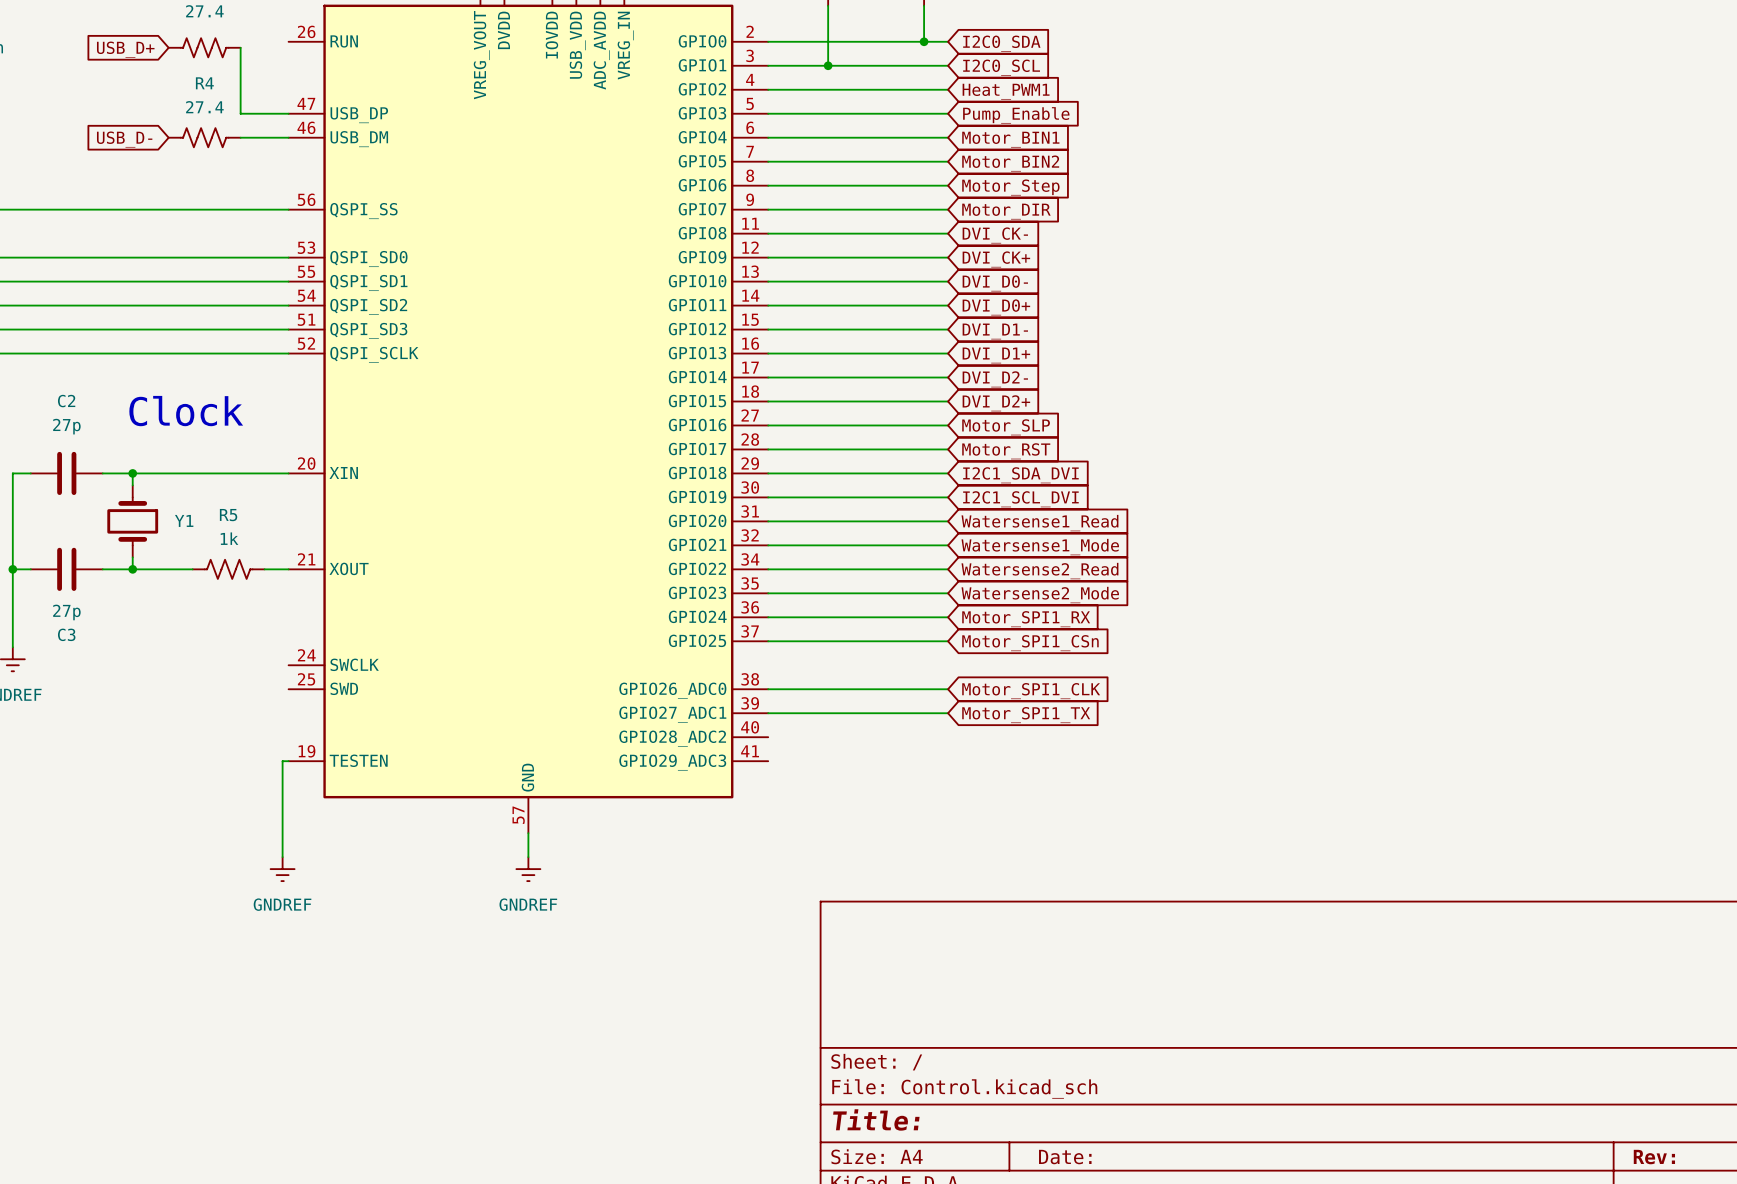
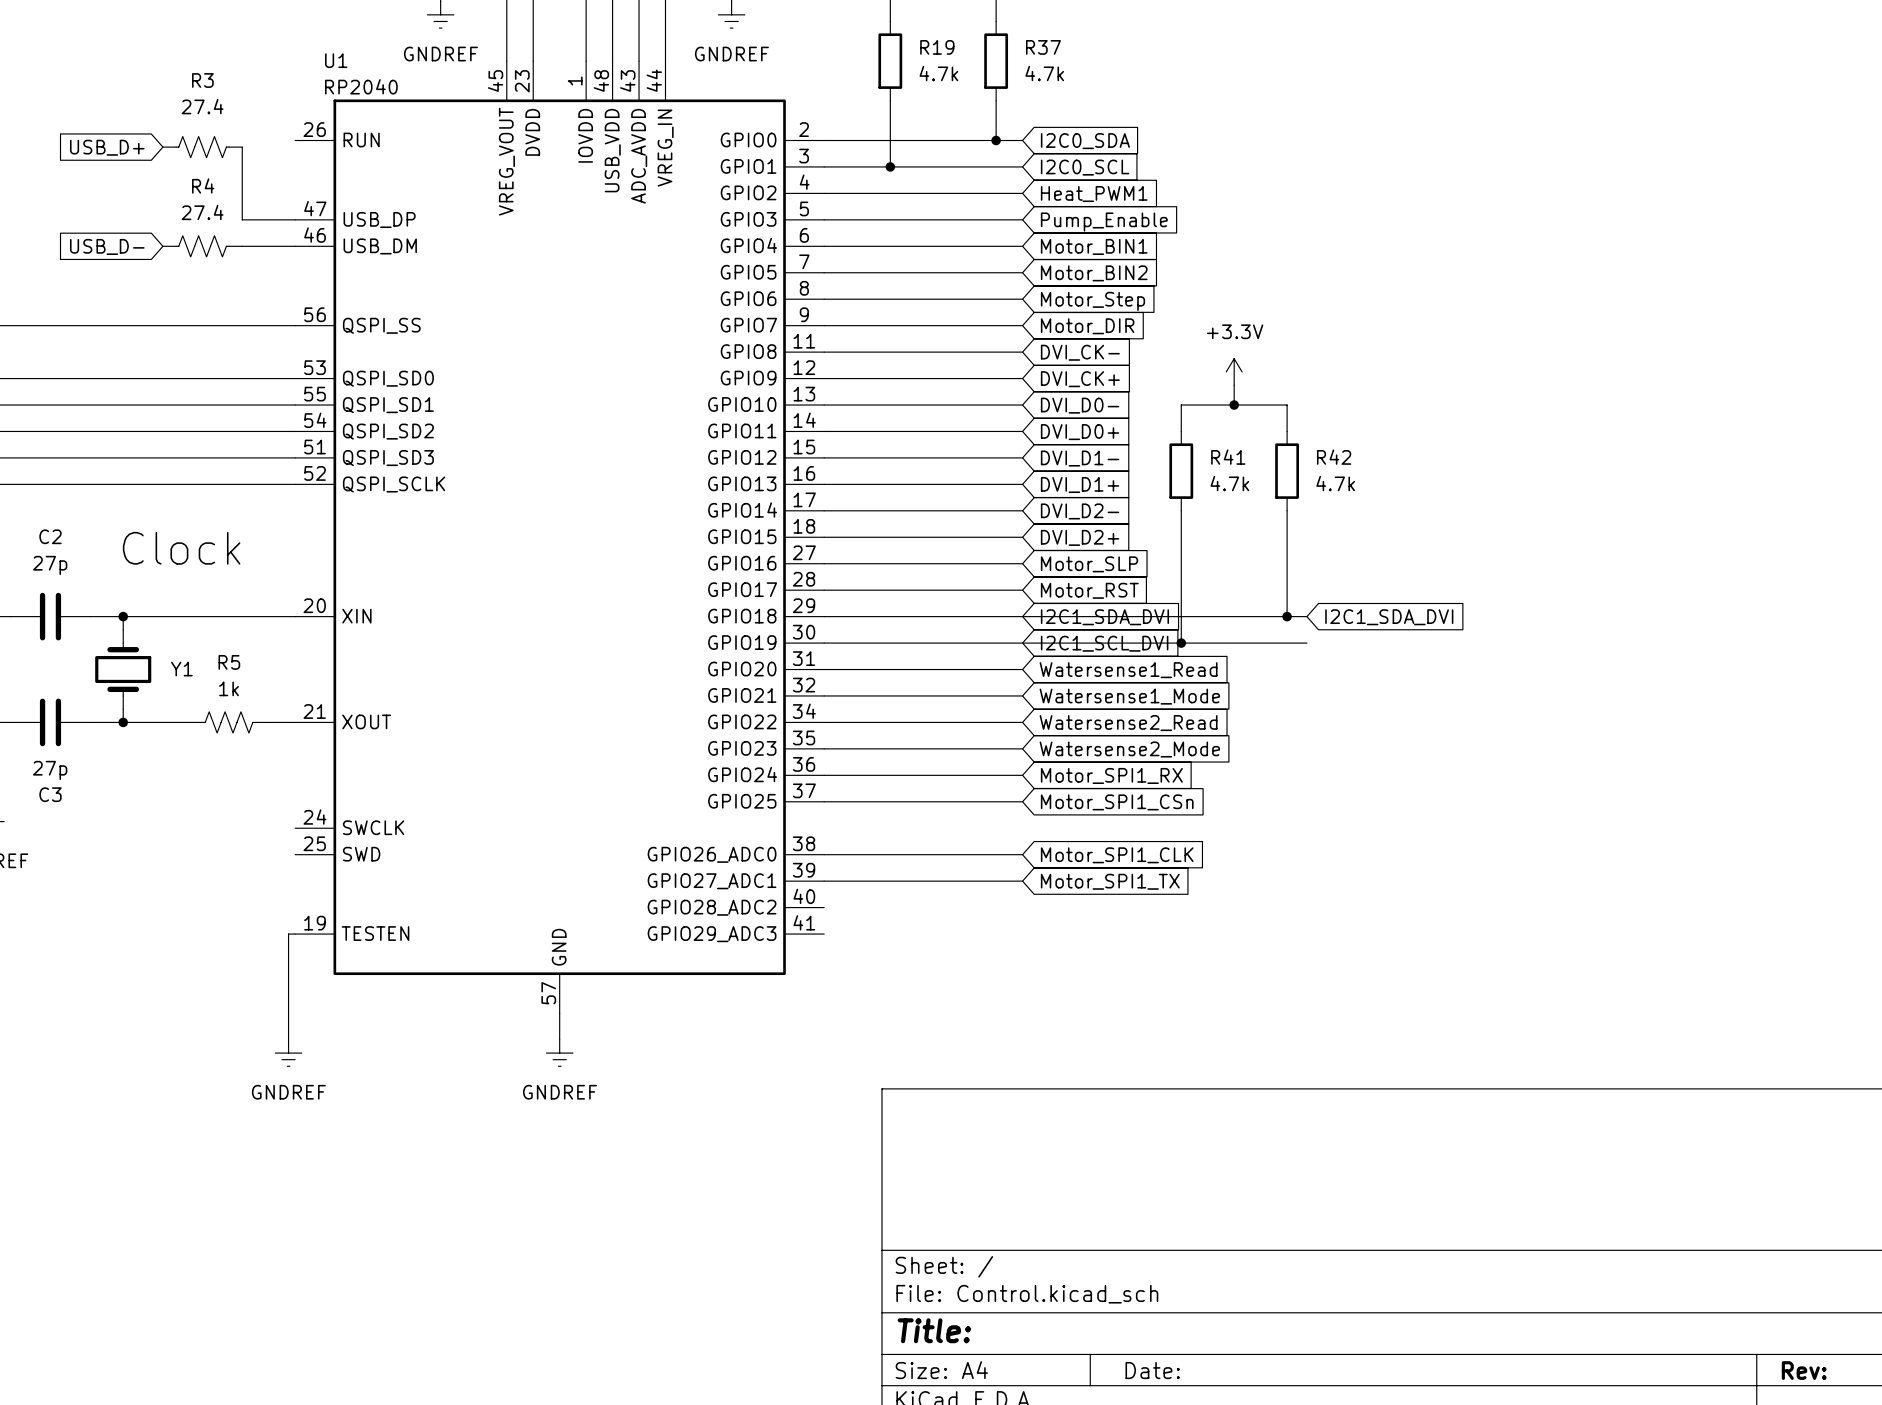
power symbol: none -> +3.3V (1234, 371)
wire: none -> (1234, 385) (1234, 405)
junction: none -> (1234, 405)
wire: none -> (1181, 431) (1181, 405) (1287, 405) (1287, 431)
R41: none -> 4.7k (1181, 471)
R42: none -> 4.7k (1287, 471)
wire: none -> (1181, 510) (1181, 643)
wire: none -> (1287, 510) (1287, 616)
wire: none -> (1022, 616) (1306, 616)
junction: none -> (1287, 616)
global label: none -> I2C1_SDA_DVI (1389, 617)
wire: none -> (1022, 643) (1306, 643)
junction: none -> (1181, 643)

